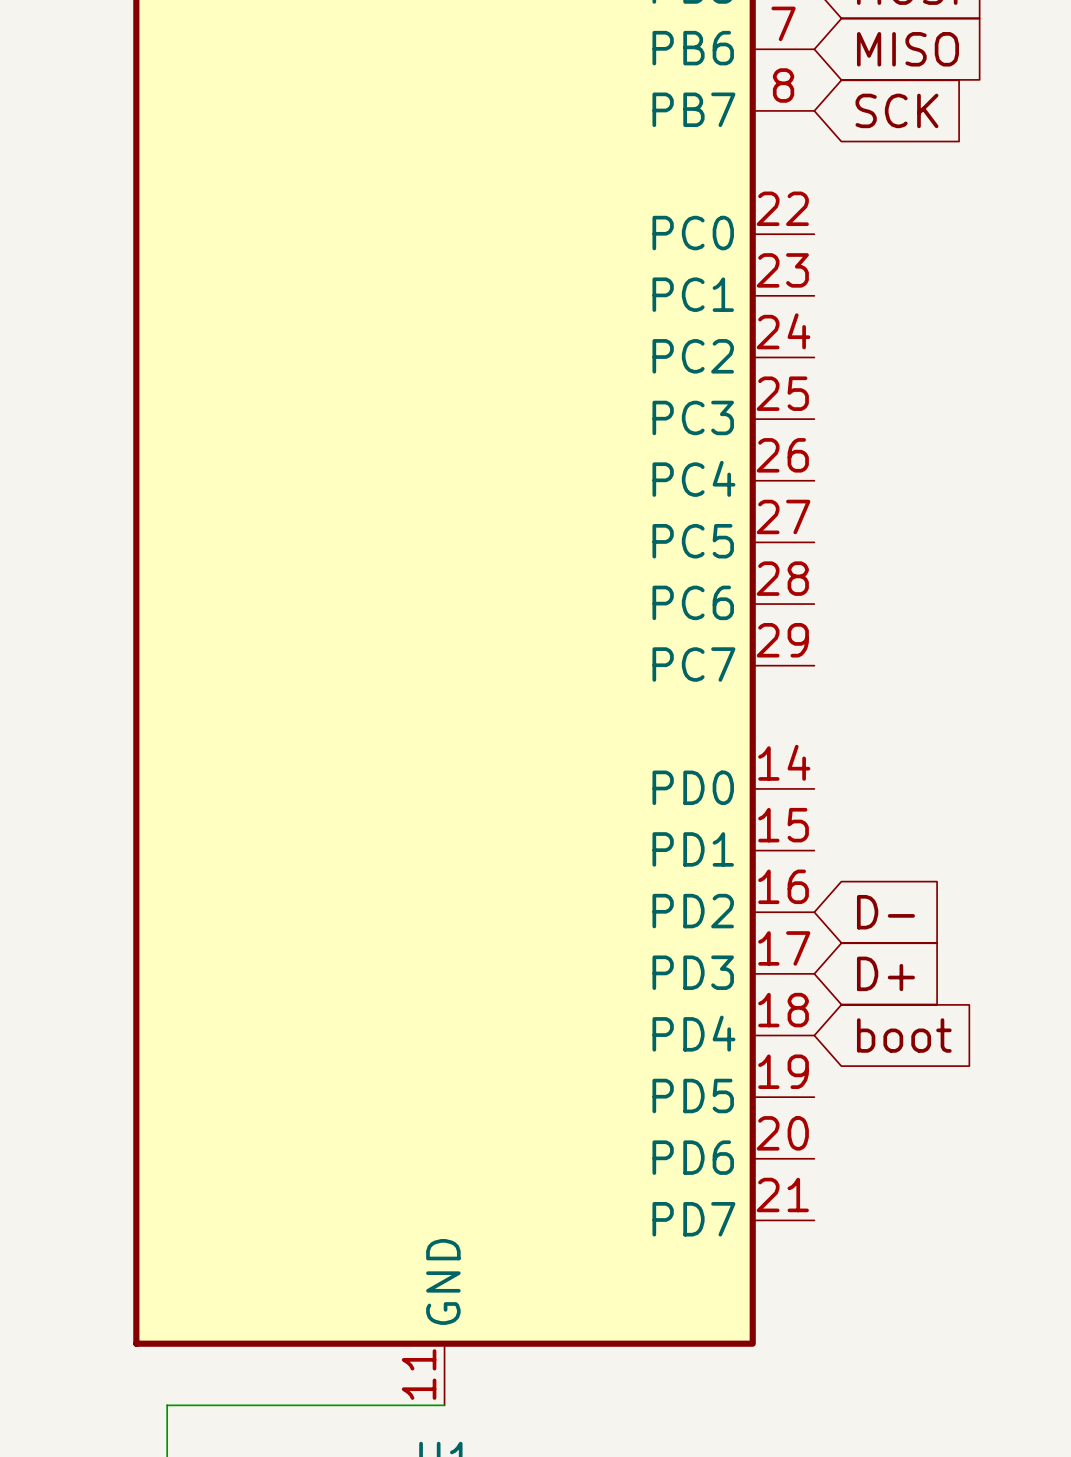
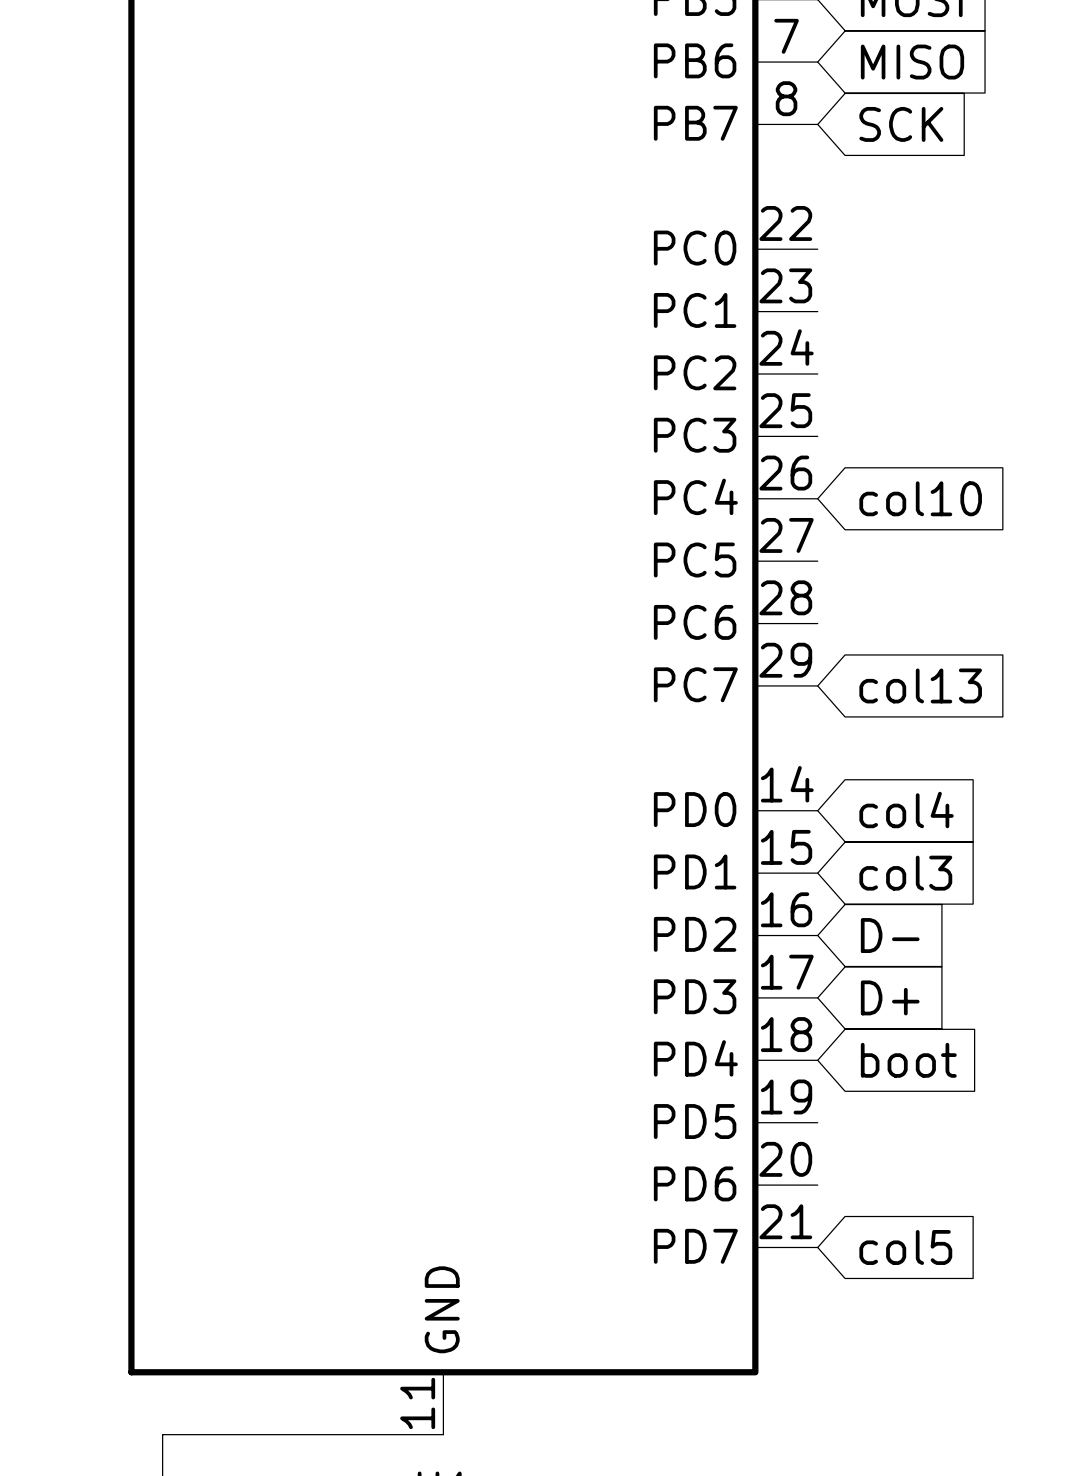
global label: none -> col10 (920, 498)
global label: none -> col13 (920, 685)
global label: none -> col4 (906, 810)
global label: none -> col3 (905, 873)
global label: none -> col5 (905, 1247)

